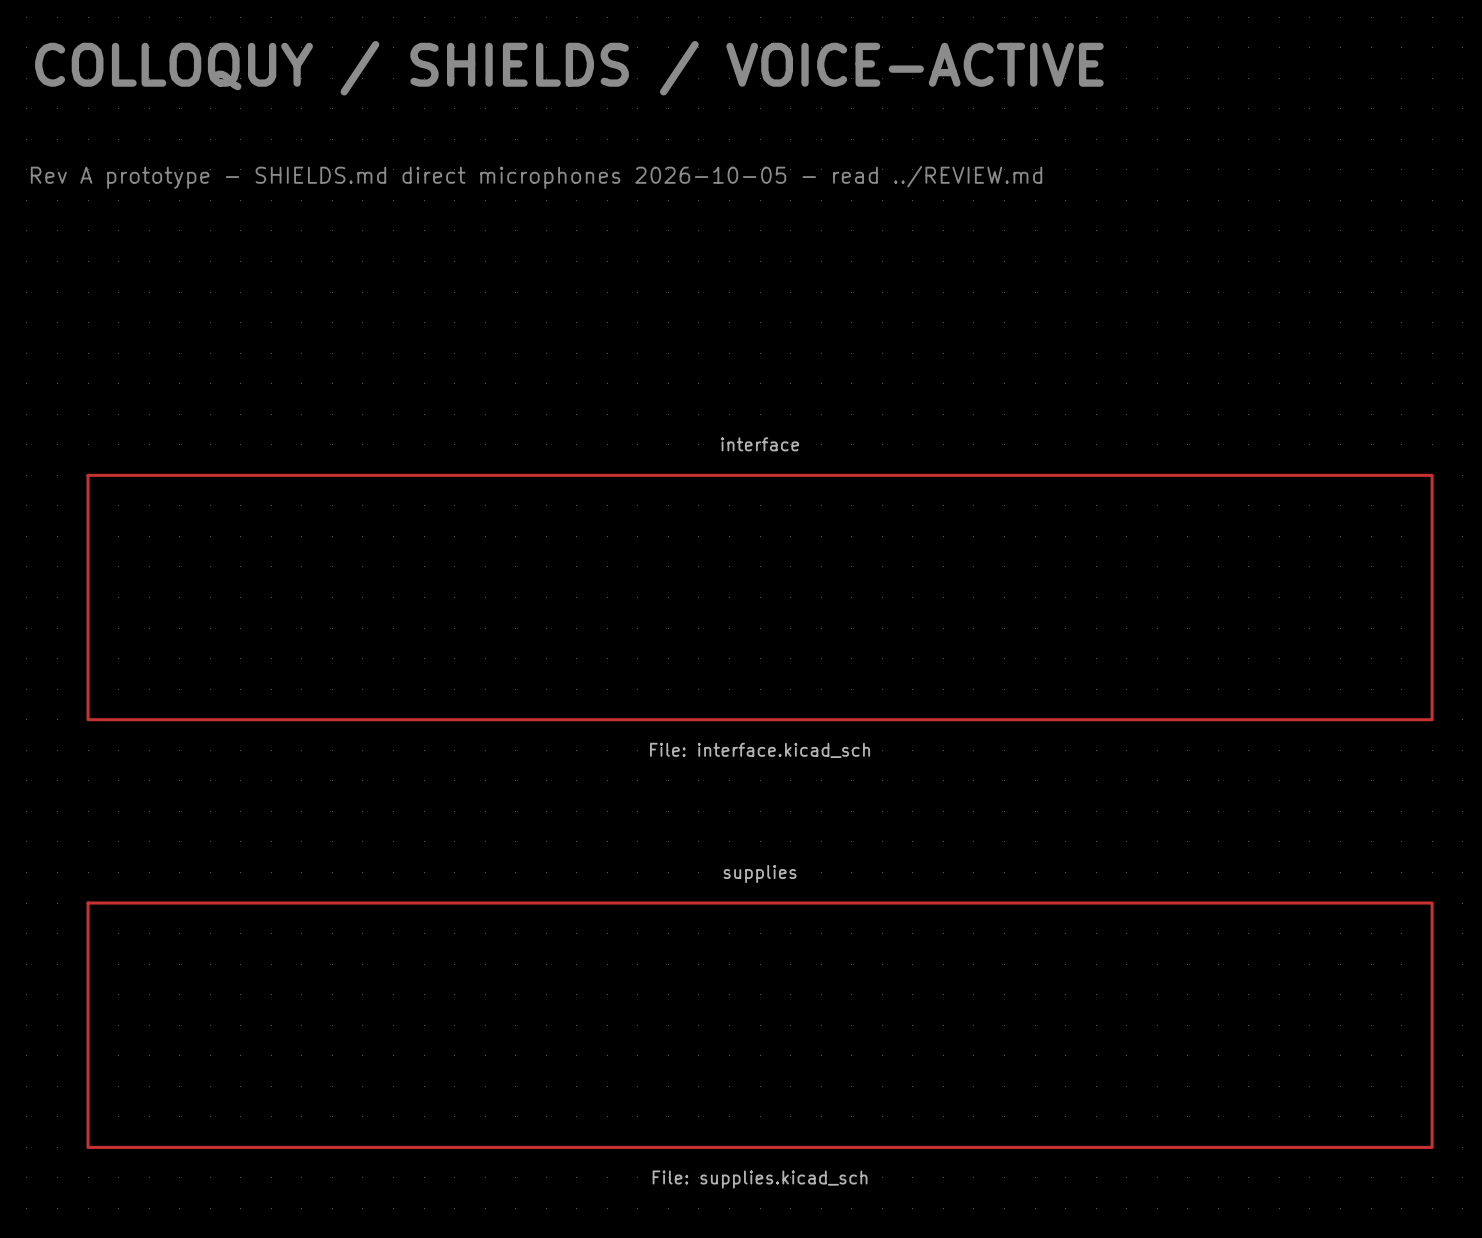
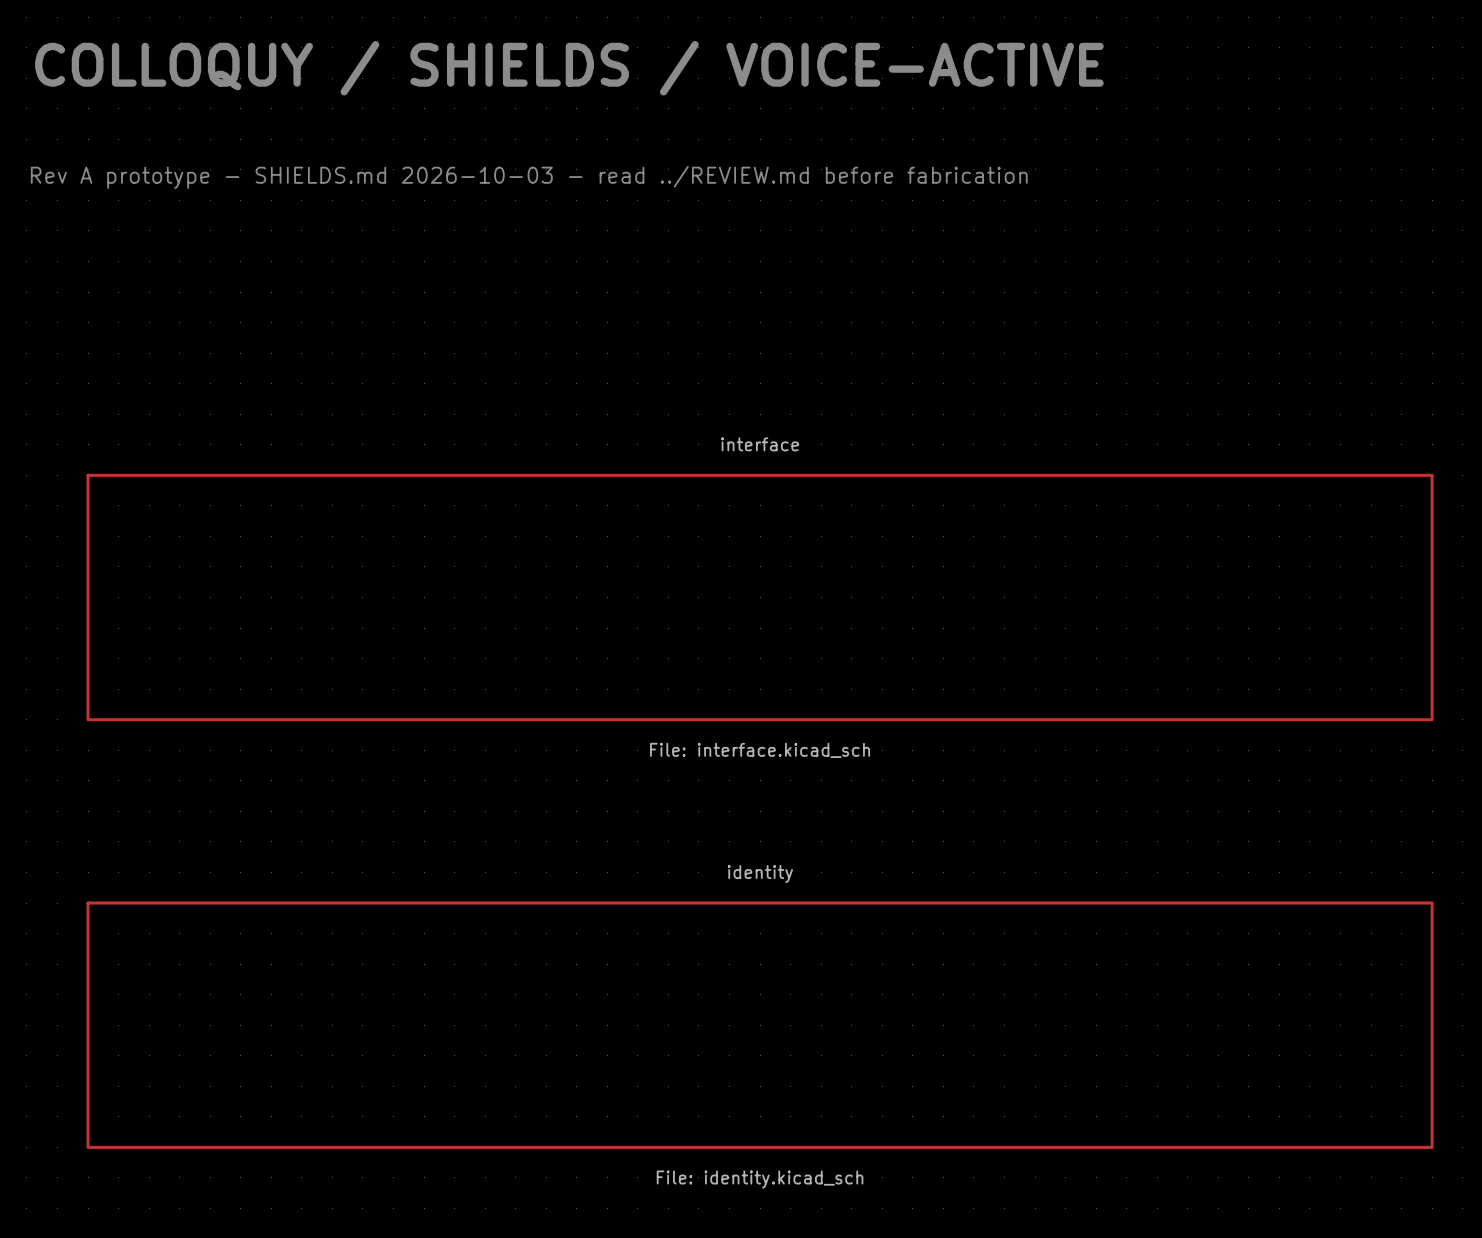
text: Rev A prototype - SHIELDS.md direct microphones 2026-10-05 - read ../REVIEW.md (536, 177) -> Rev A prototype - SHIELDS.md 2026-10-03 - read ../REVIEW.md before fabrication (529, 177)
sheet supplies name: supplies (760, 874) -> identity (760, 874)
sheet supplies value: File: supplies.kicad_sch (760, 1179) -> File: identity.kicad_sch (760, 1179)

